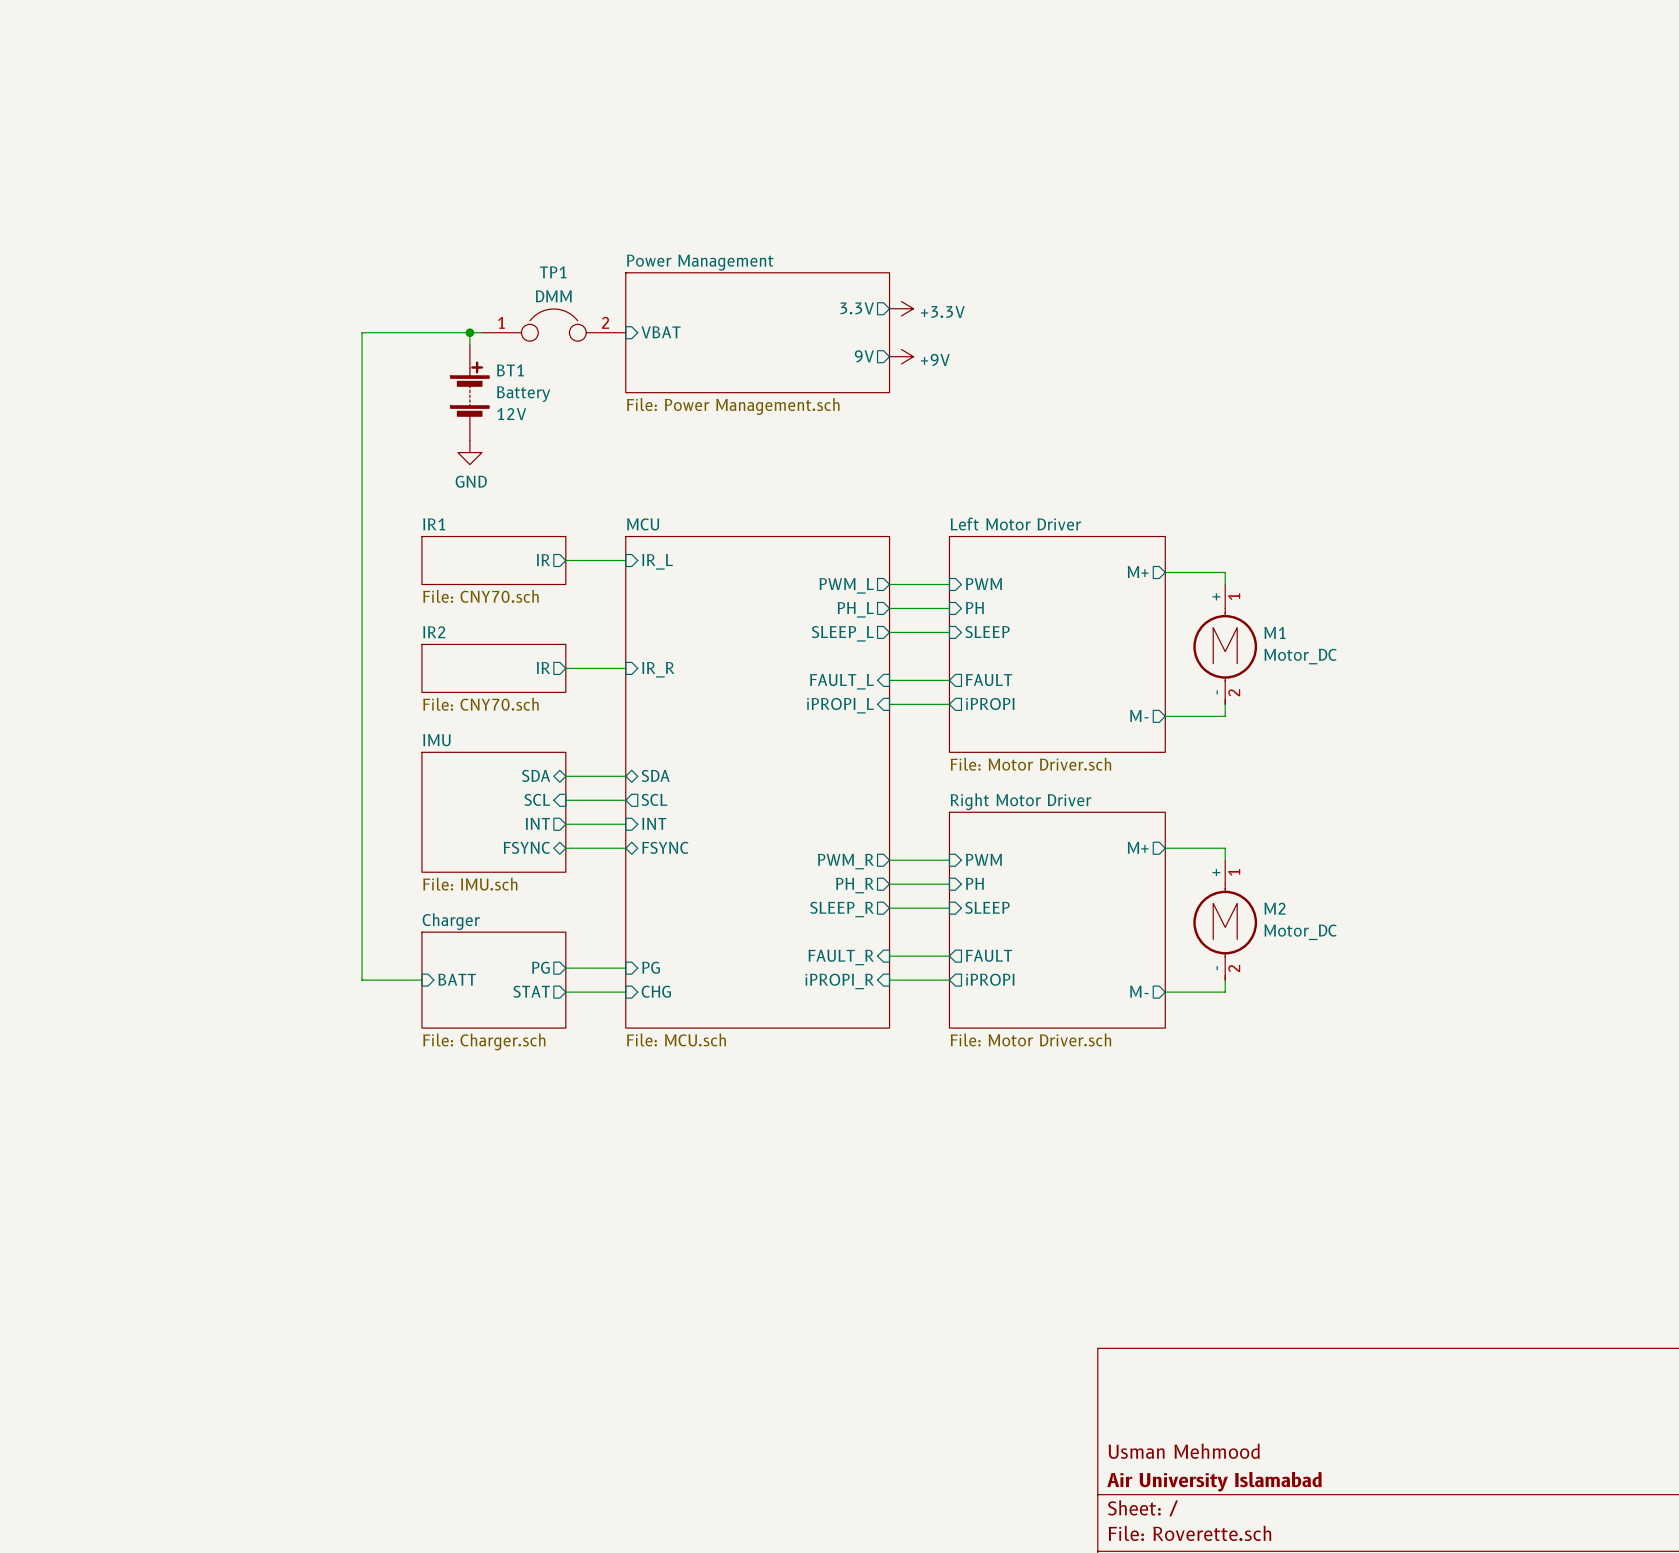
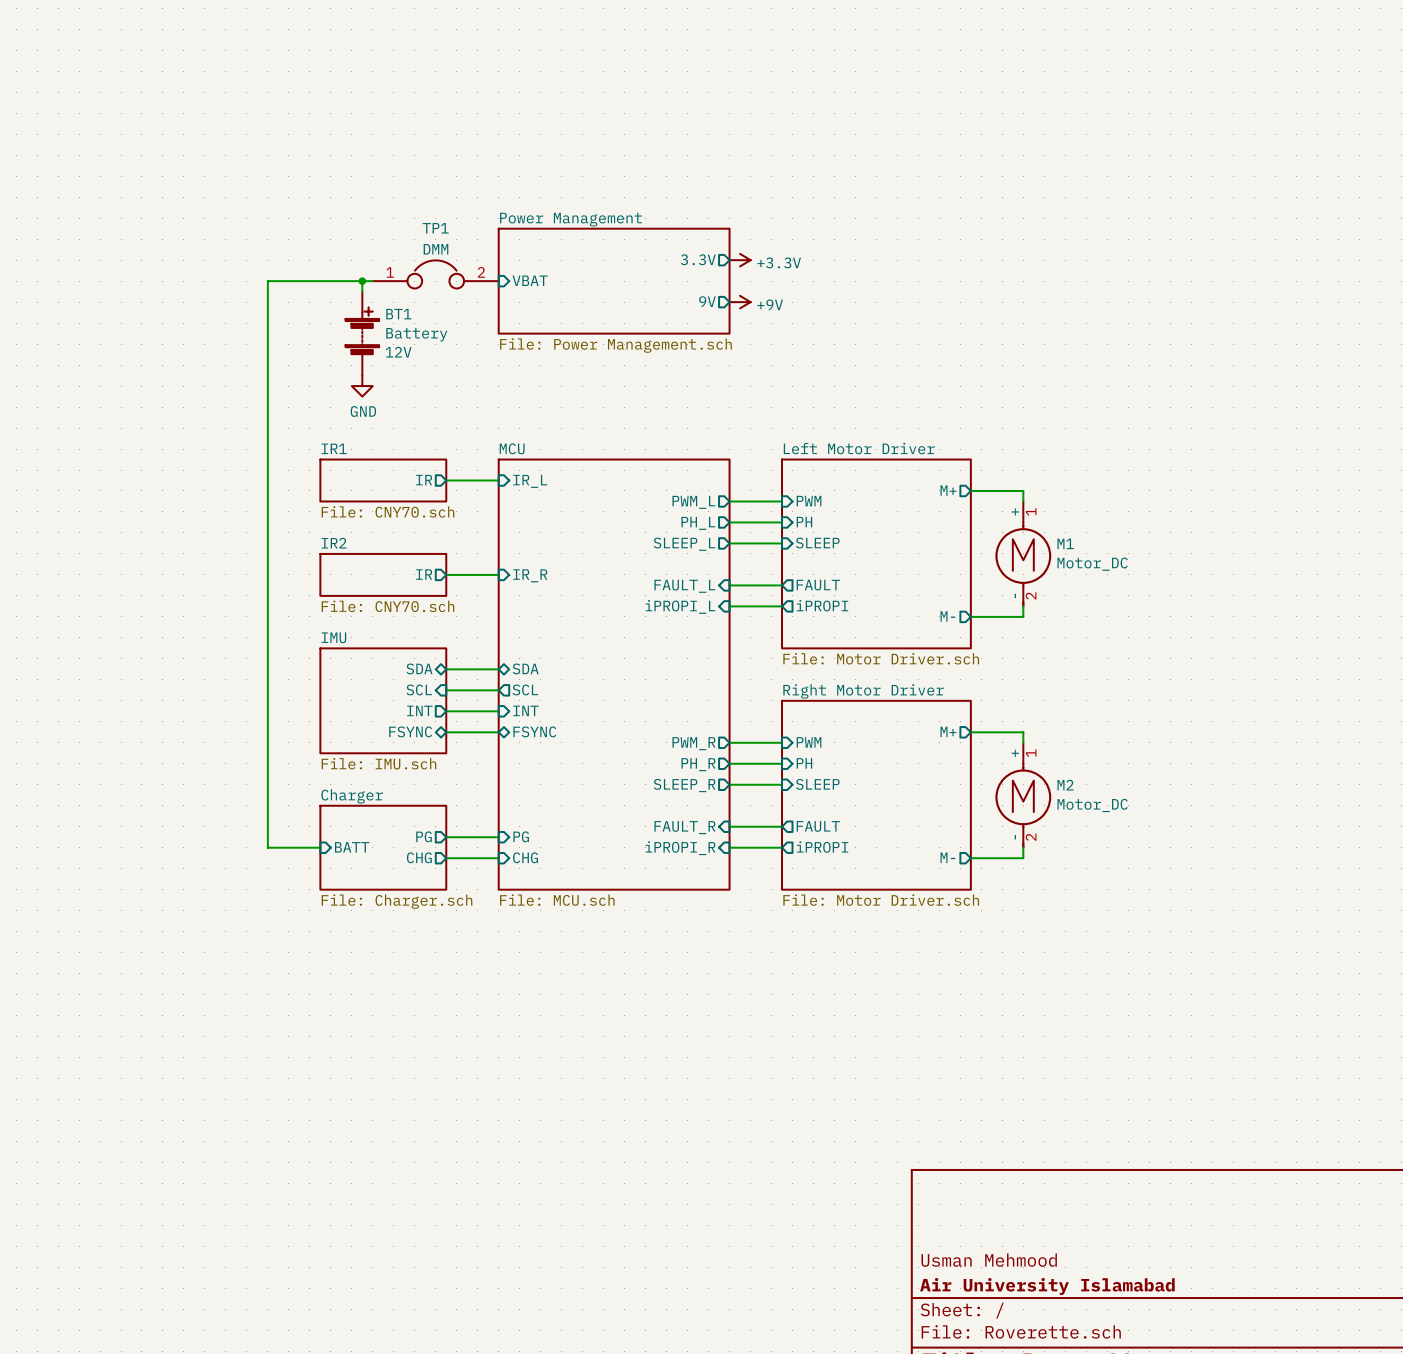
sheet pin: STAT (531, 991) -> CHG (419, 857)

